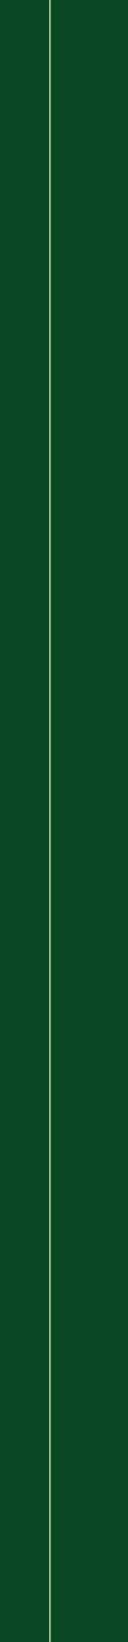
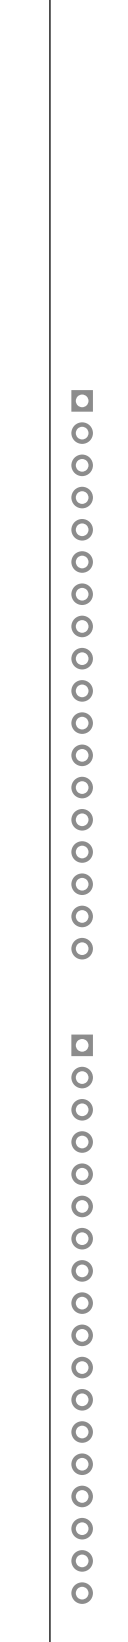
part: none -> (82, 674)
part: none -> (82, 1319)

